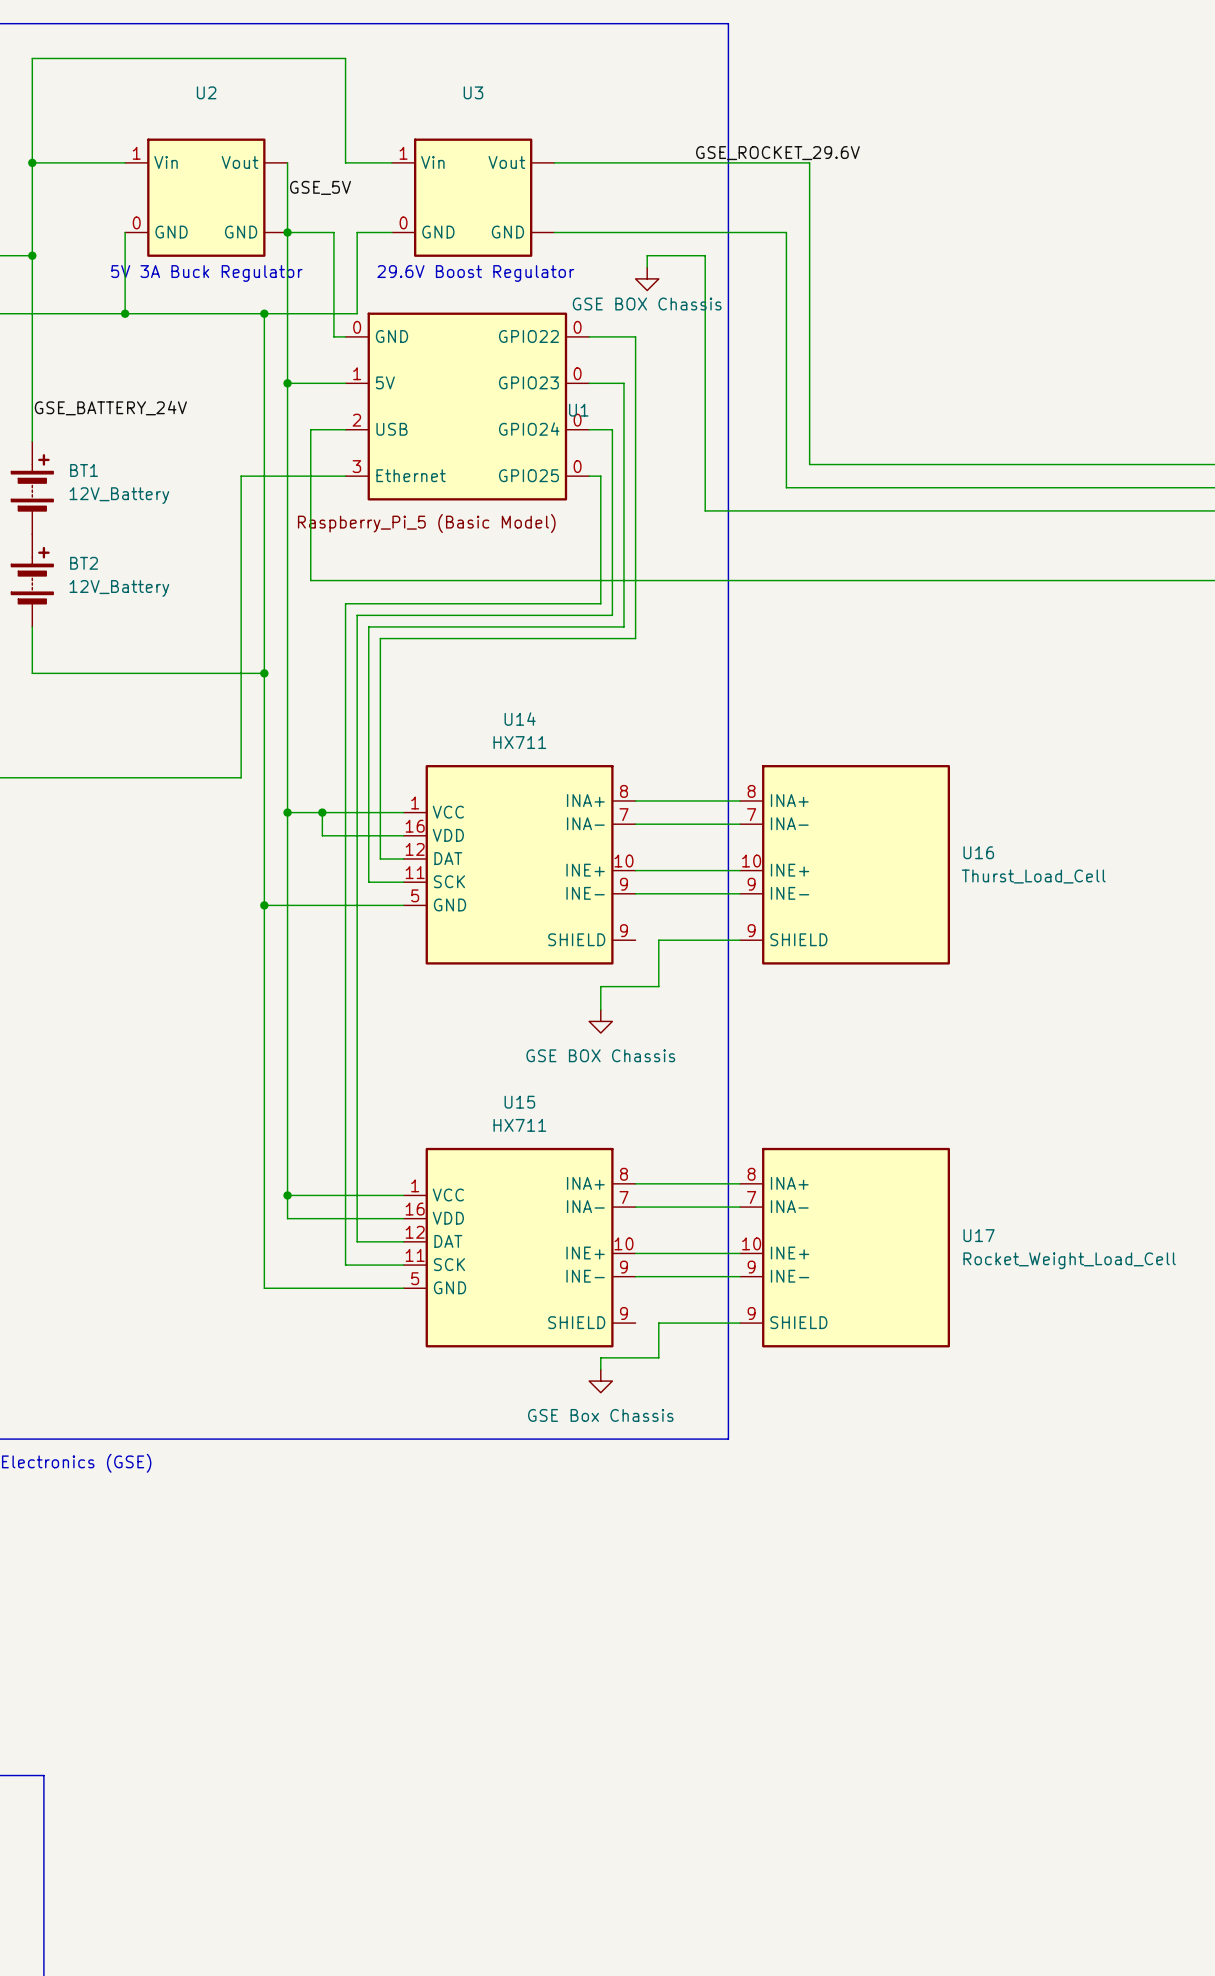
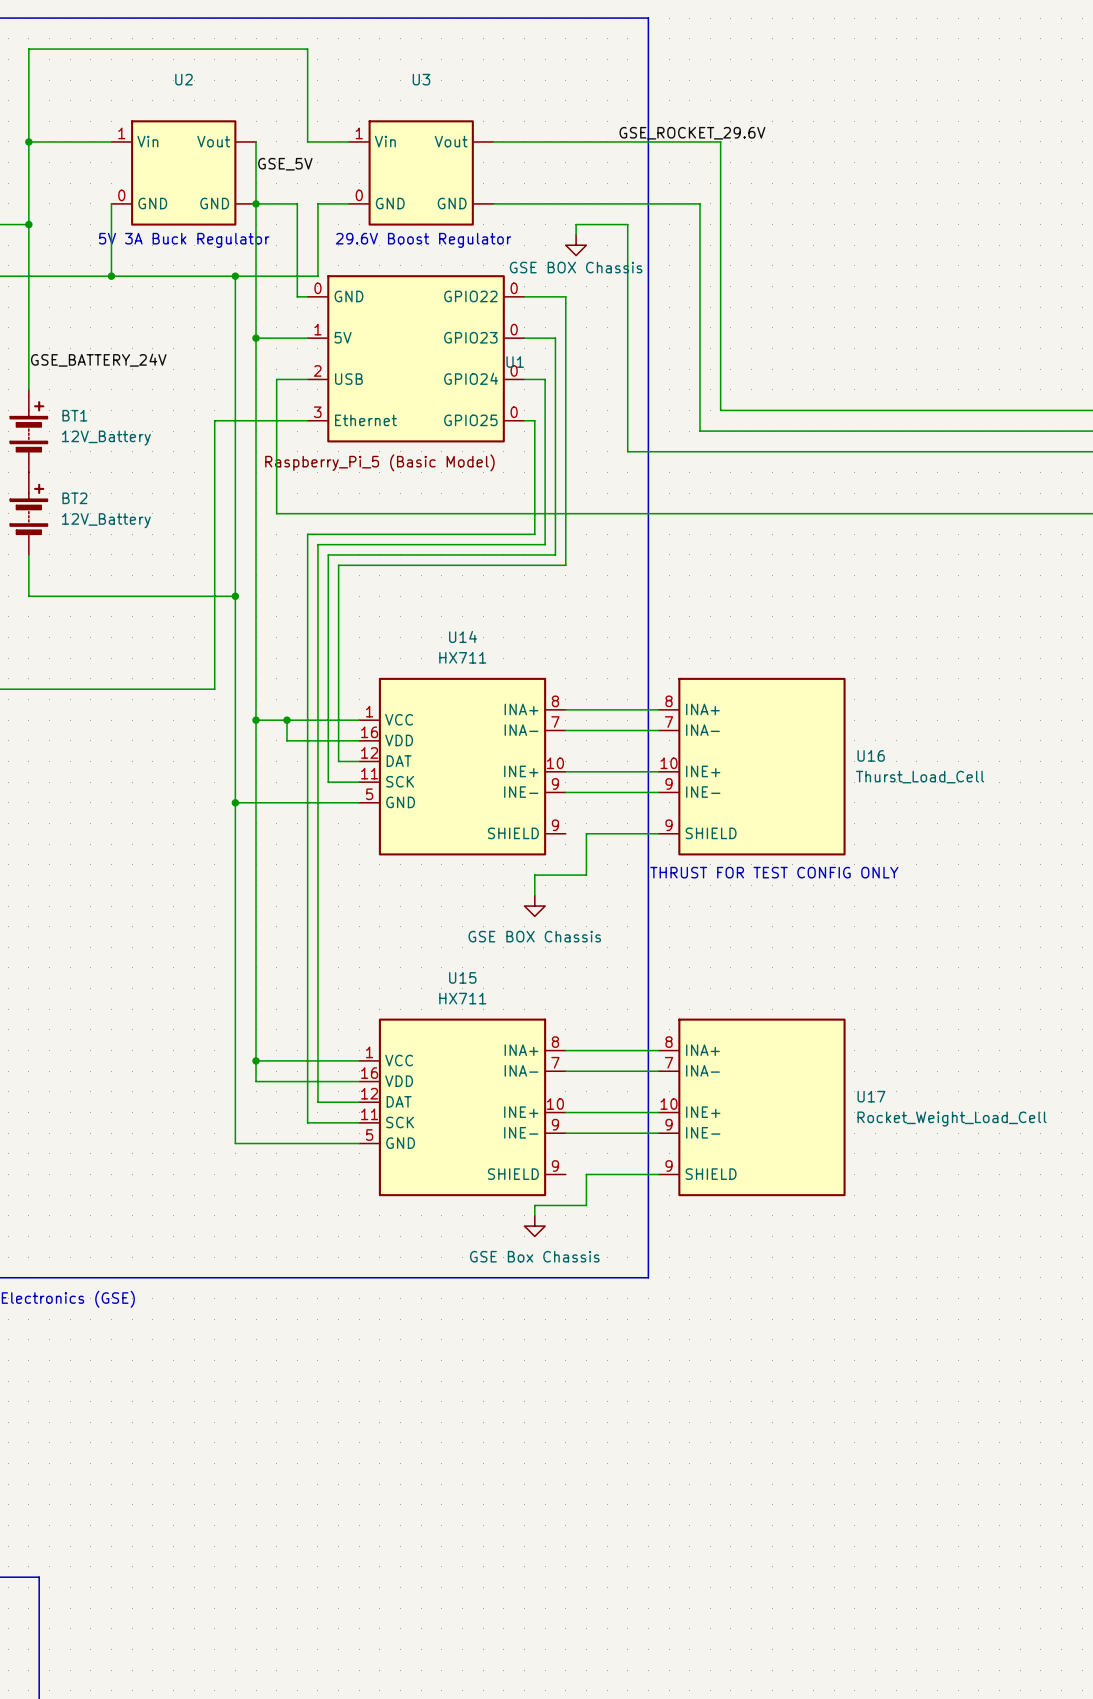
text: none -> THRUST FOR TEST CONFIG ONLY (774, 872)

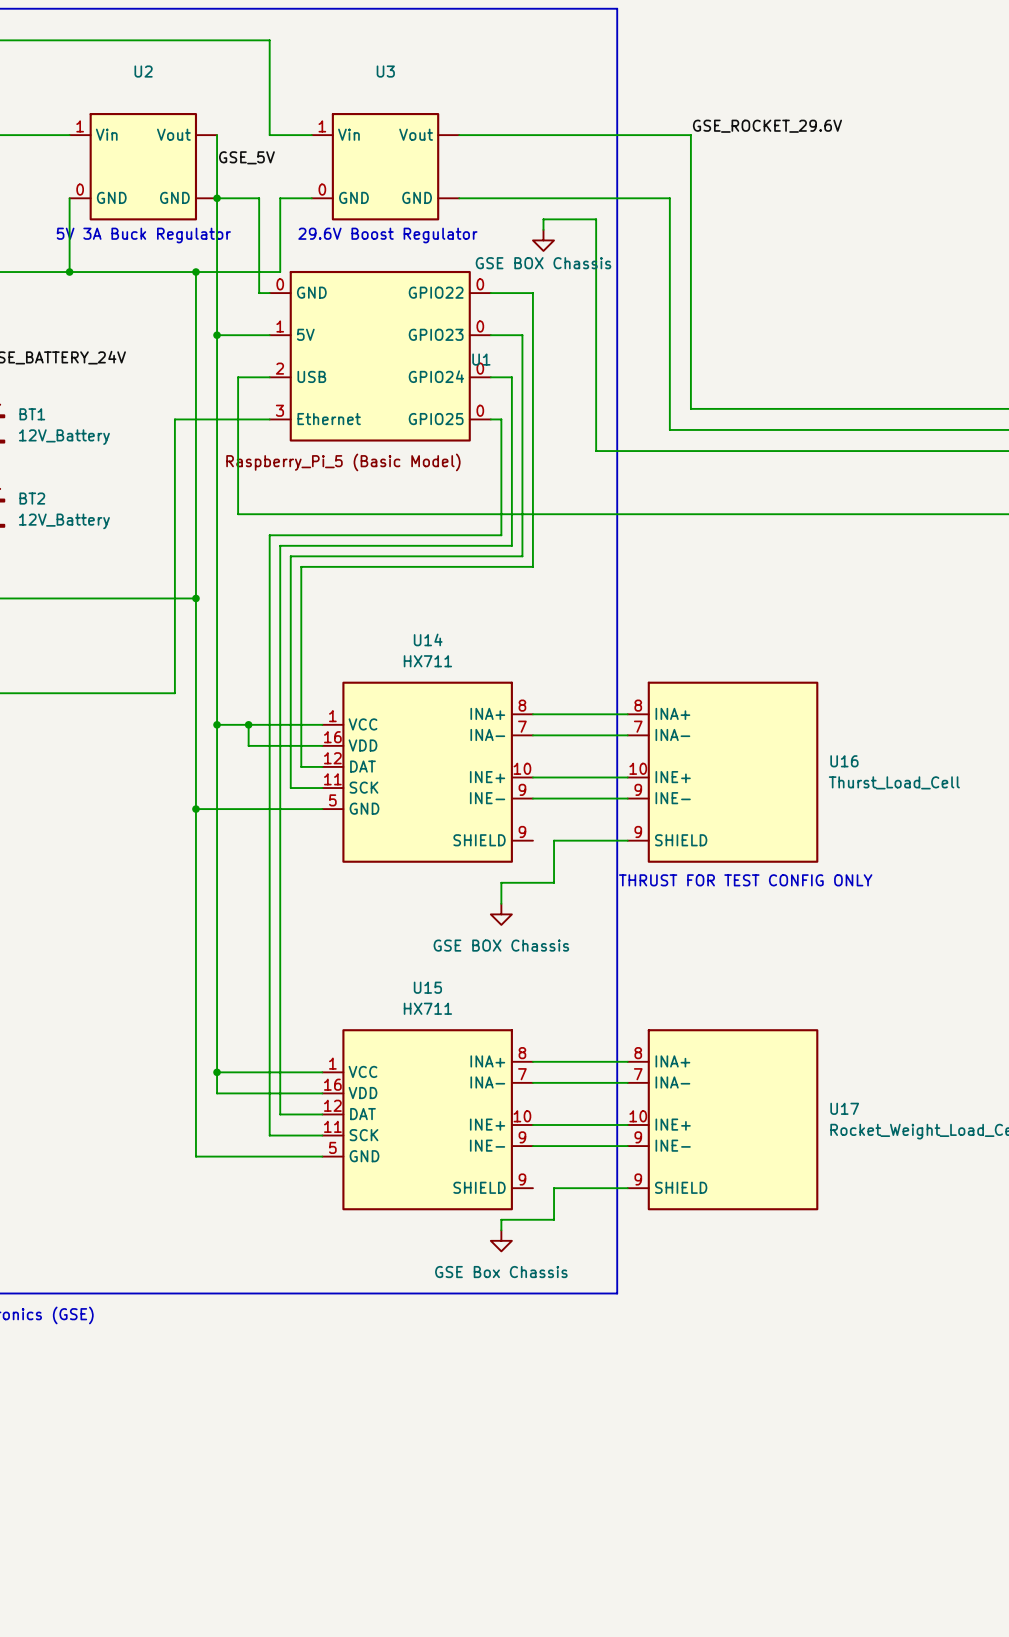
label position: GSE_ROCKET_29.6V (692, 133) -> GSE_ROCKET_29.6V (767, 126)

